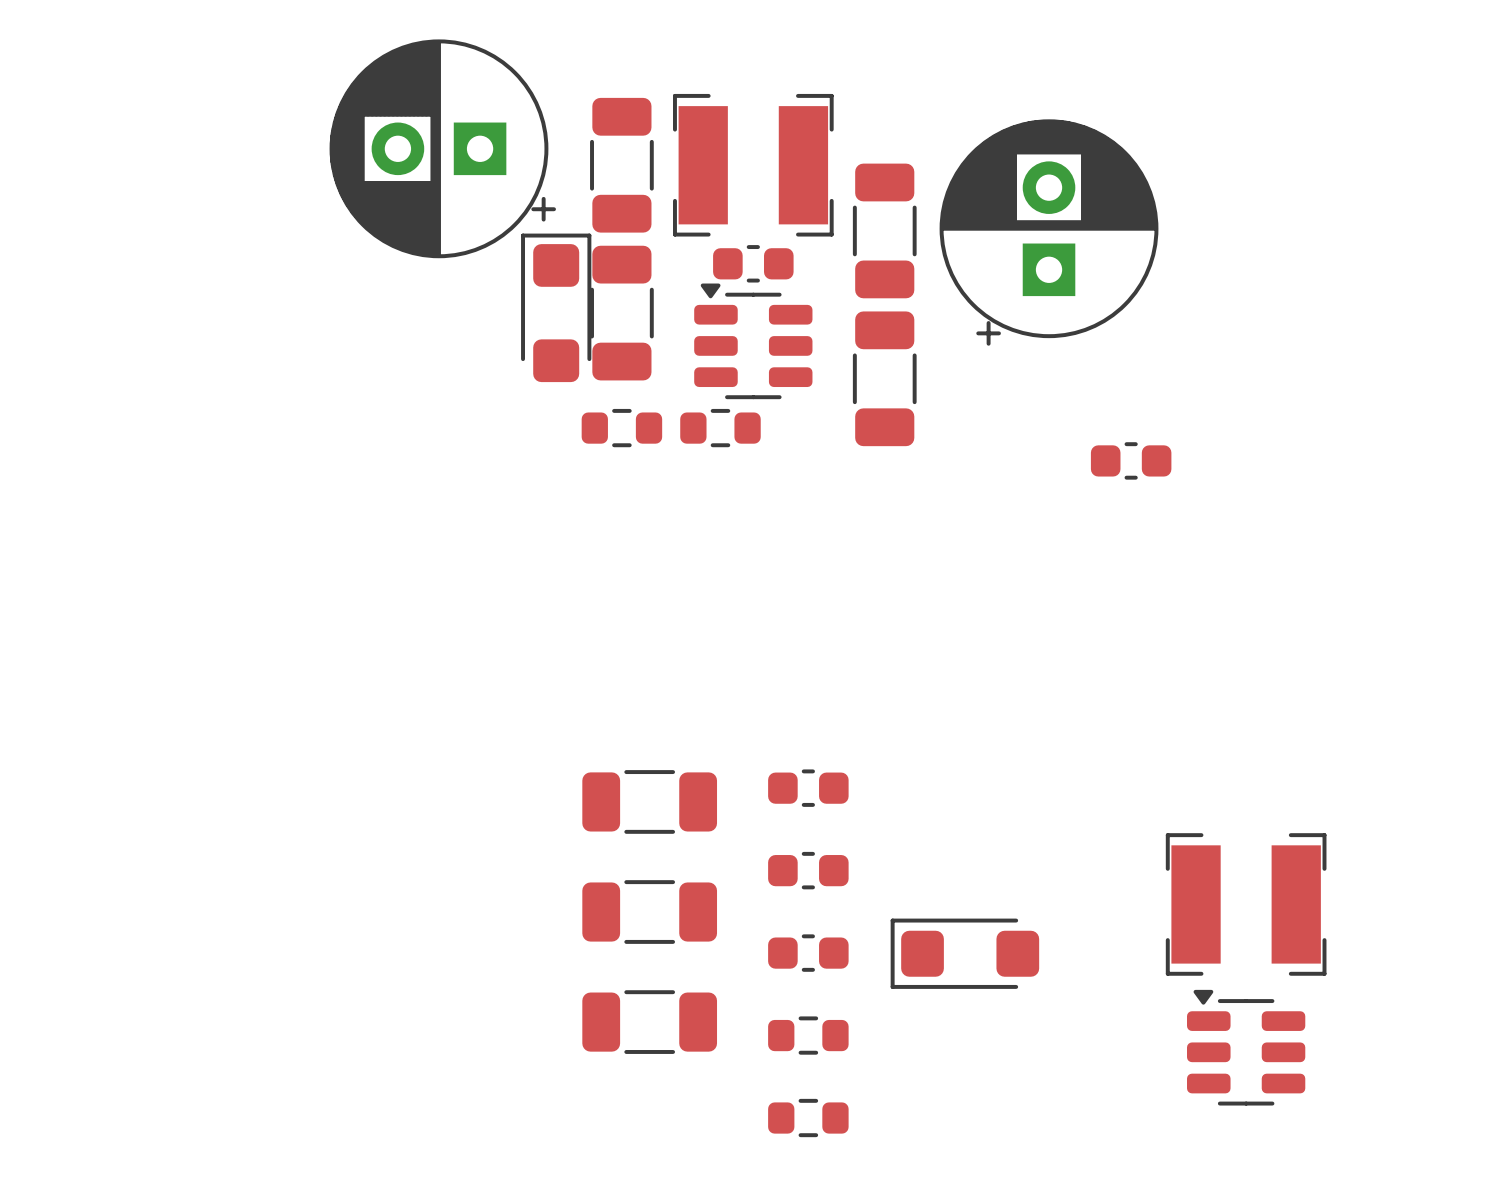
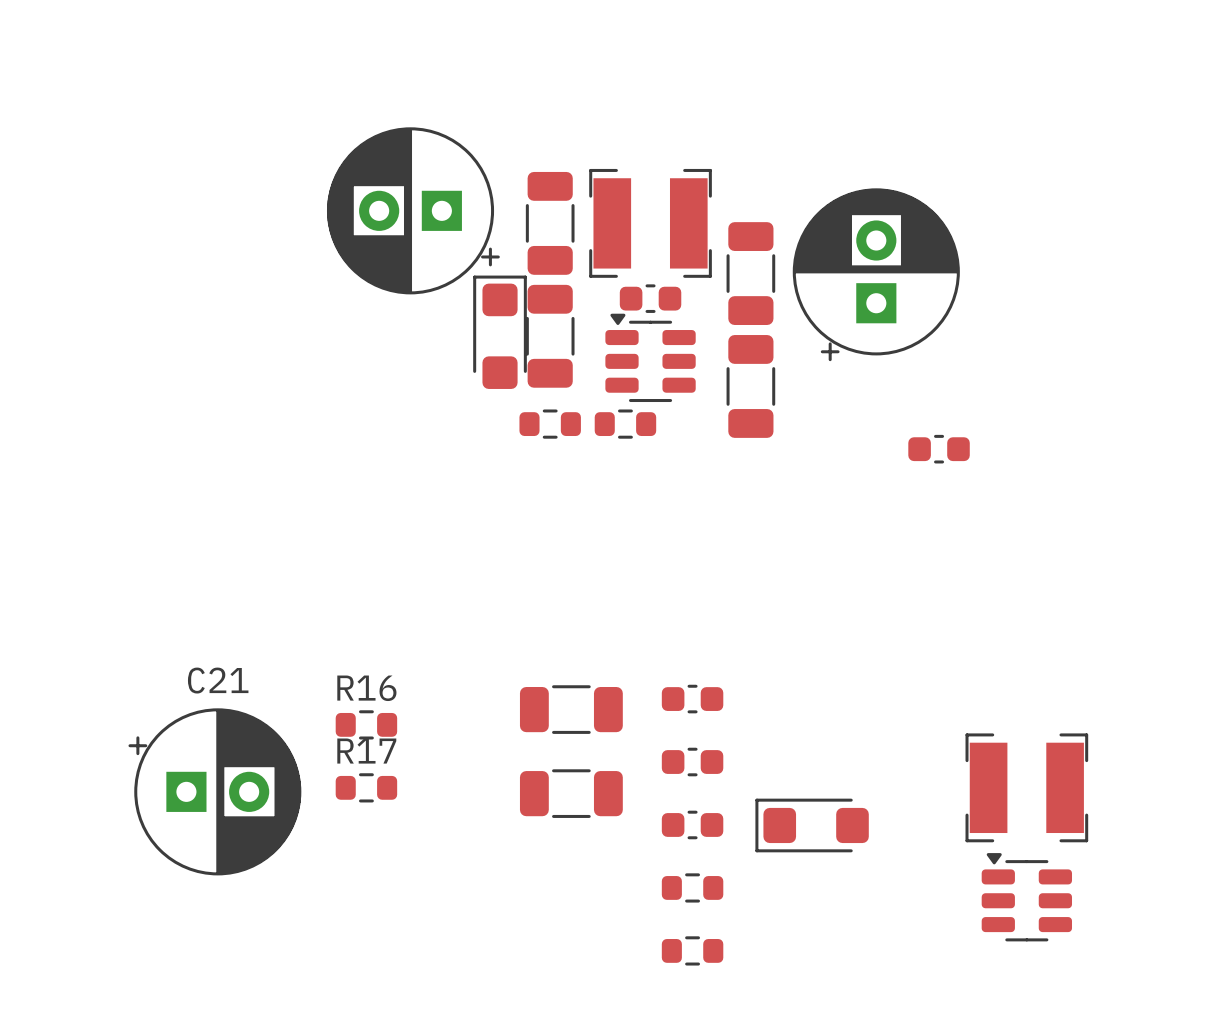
R16: none -> (366, 724)
R17: none -> (366, 787)
C21: none -> (214, 791)
part: (649, 1022) -> none

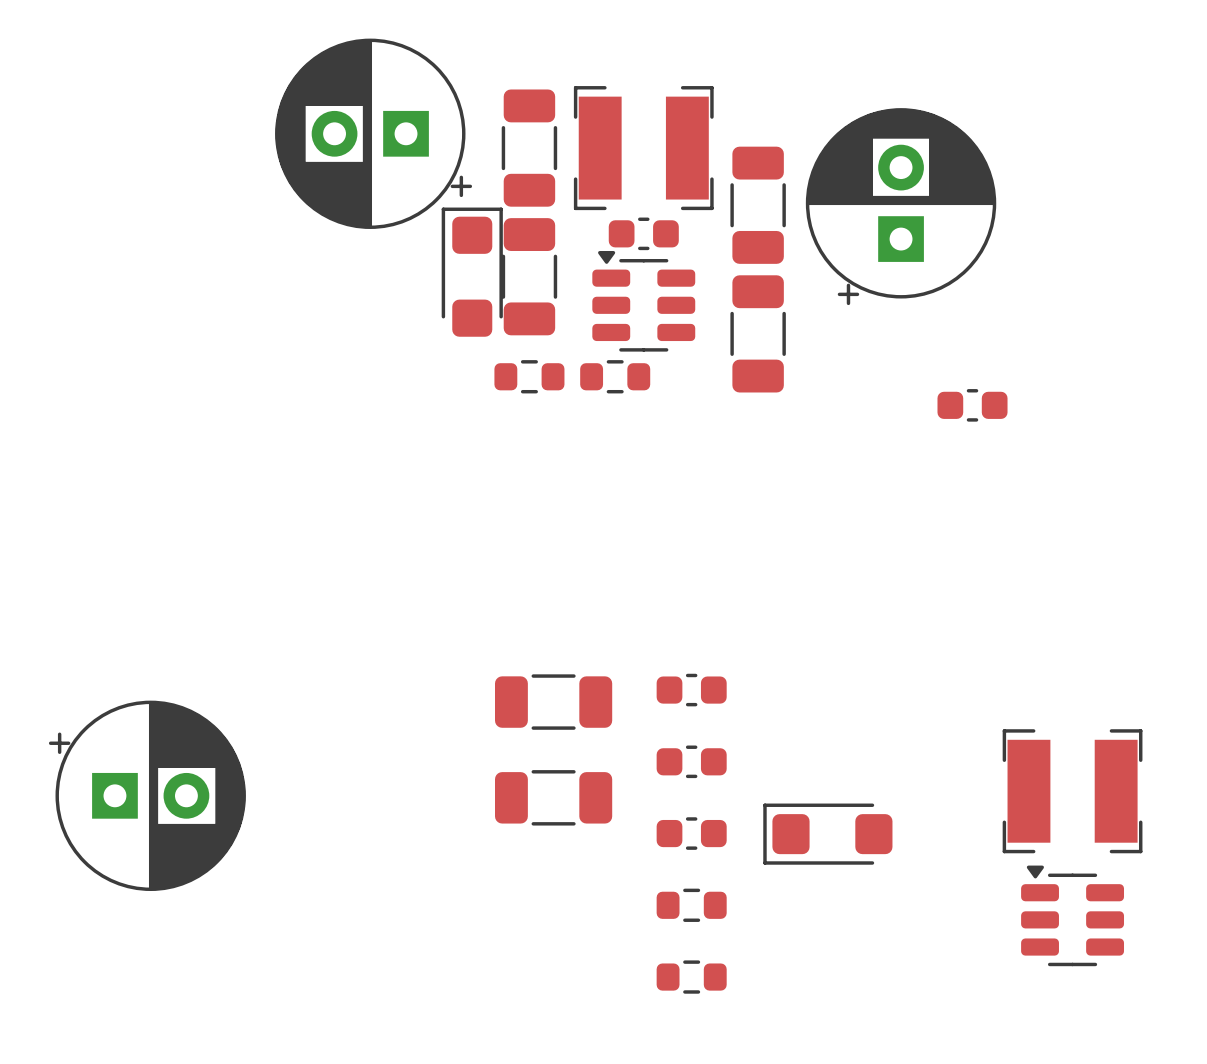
C21 name: C21 (218, 680) -> none
R16: (366, 724) -> none
R17: (366, 787) -> none

